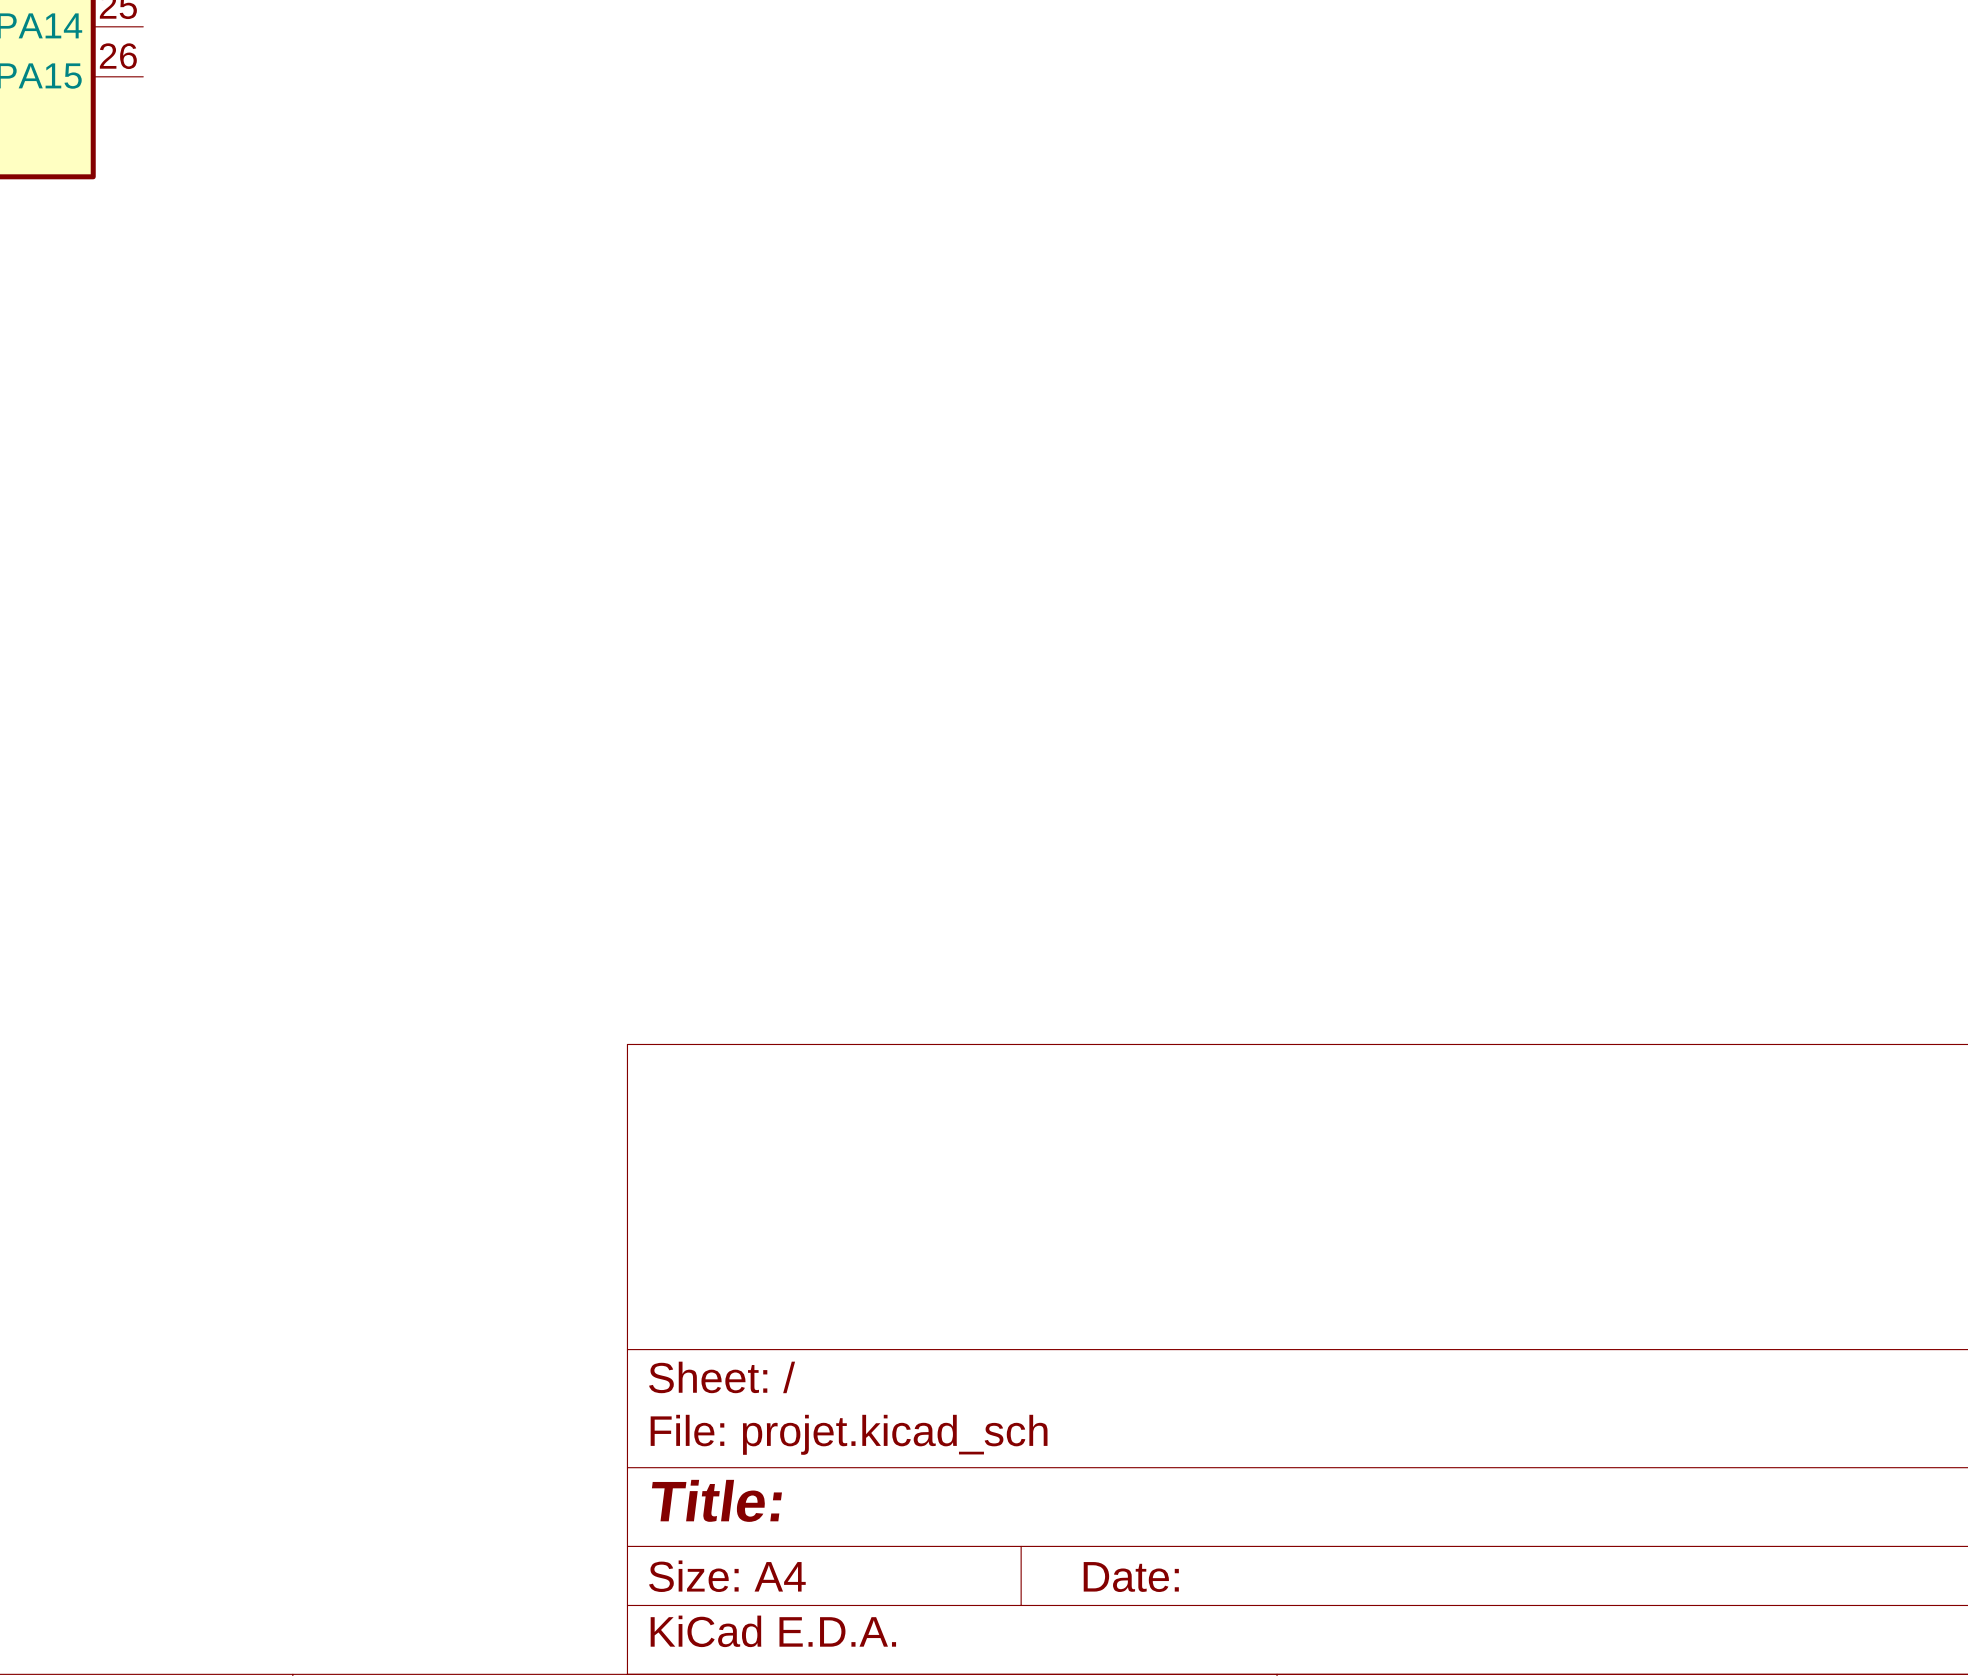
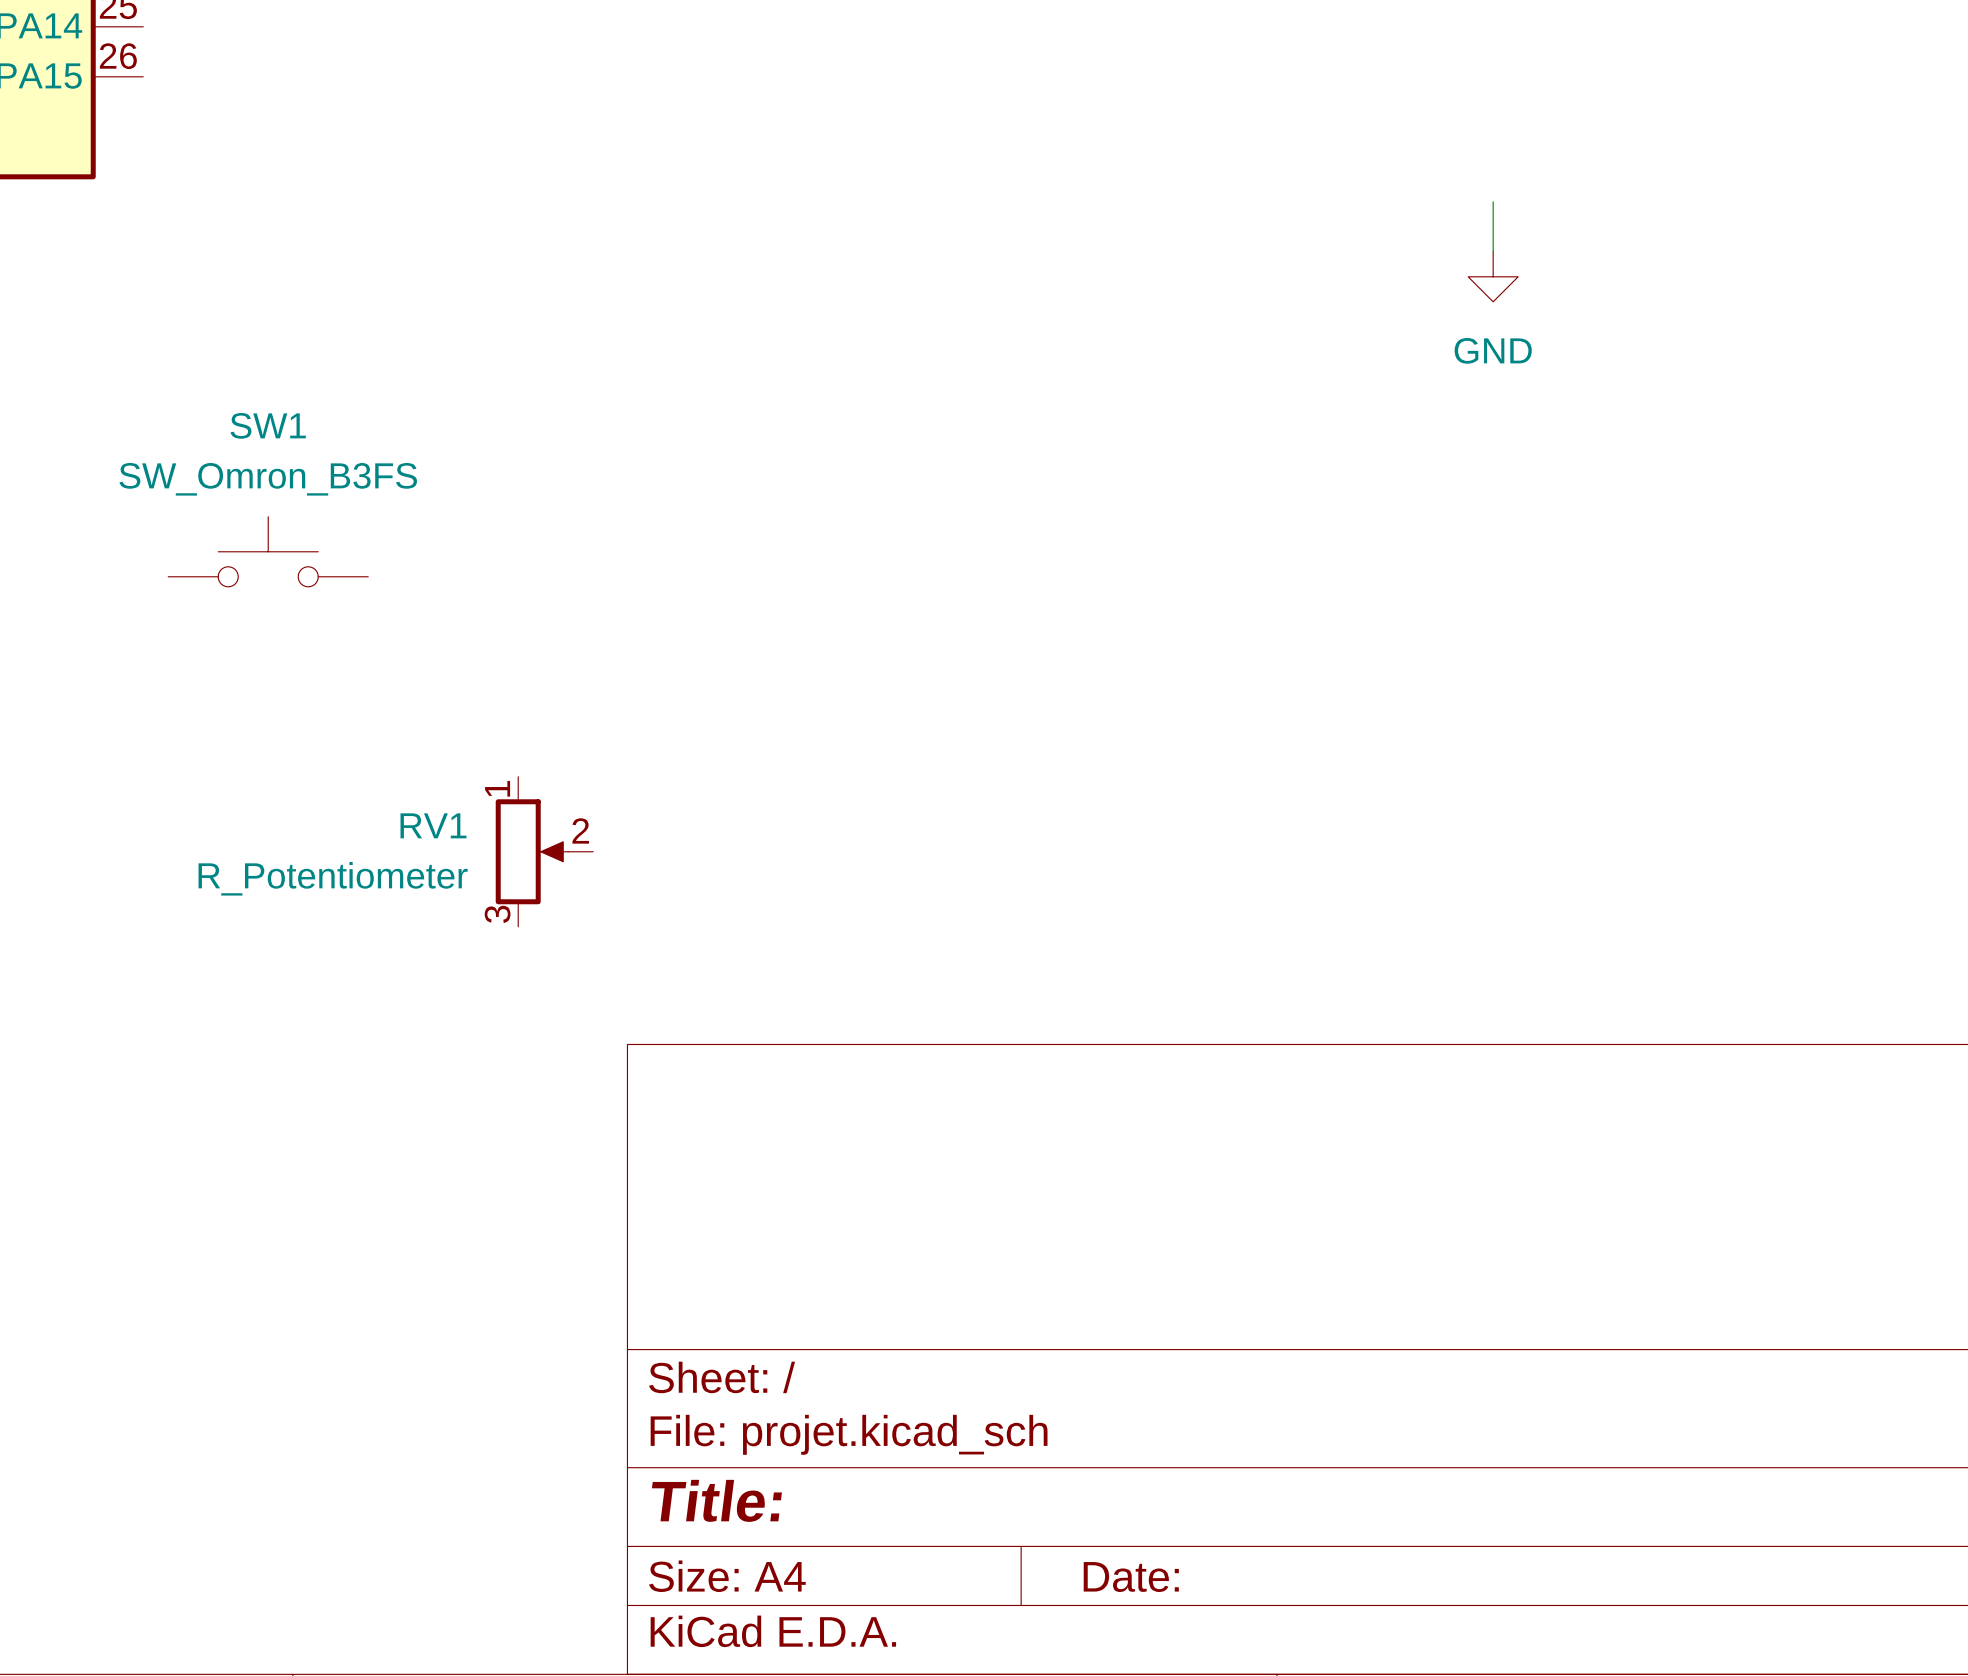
wire: none -> (1493, 201) (1493, 251)
power symbol: none -> GND (1493, 276)
SW1: none -> SW_Omron_B3FS (268, 551)
RV1: none -> R_Potentiometer (544, 851)

